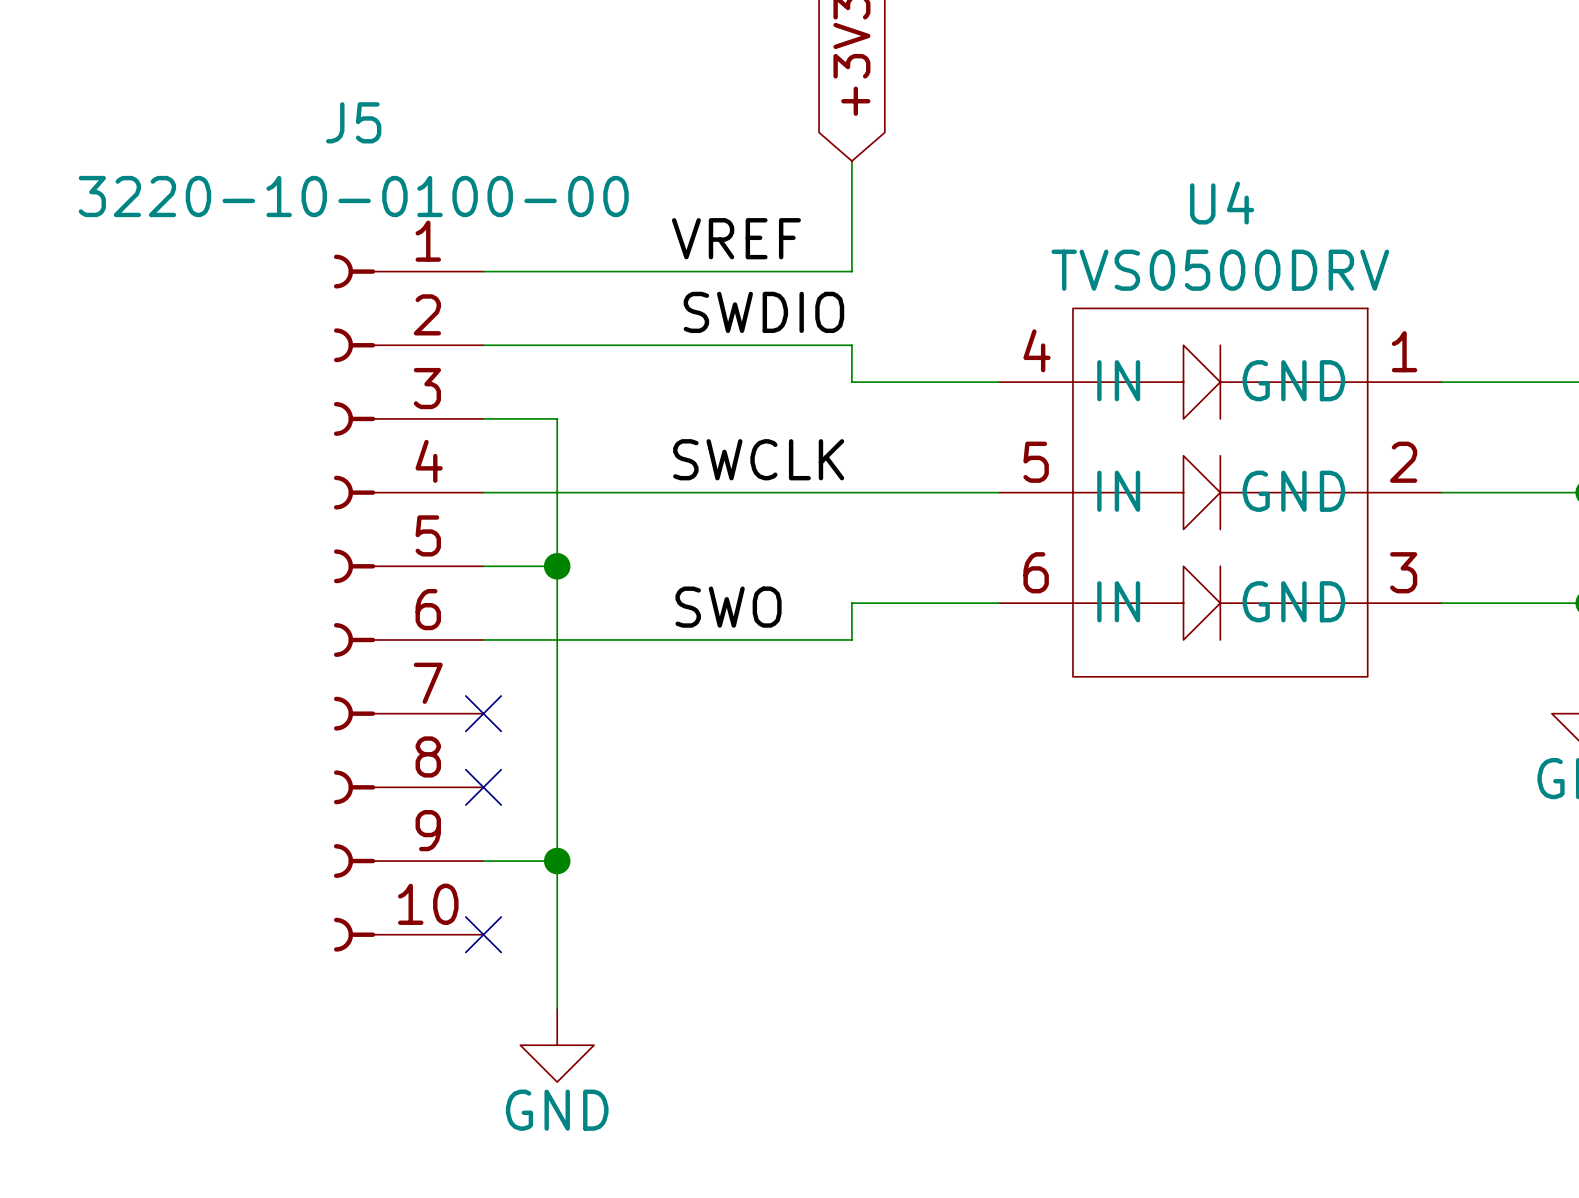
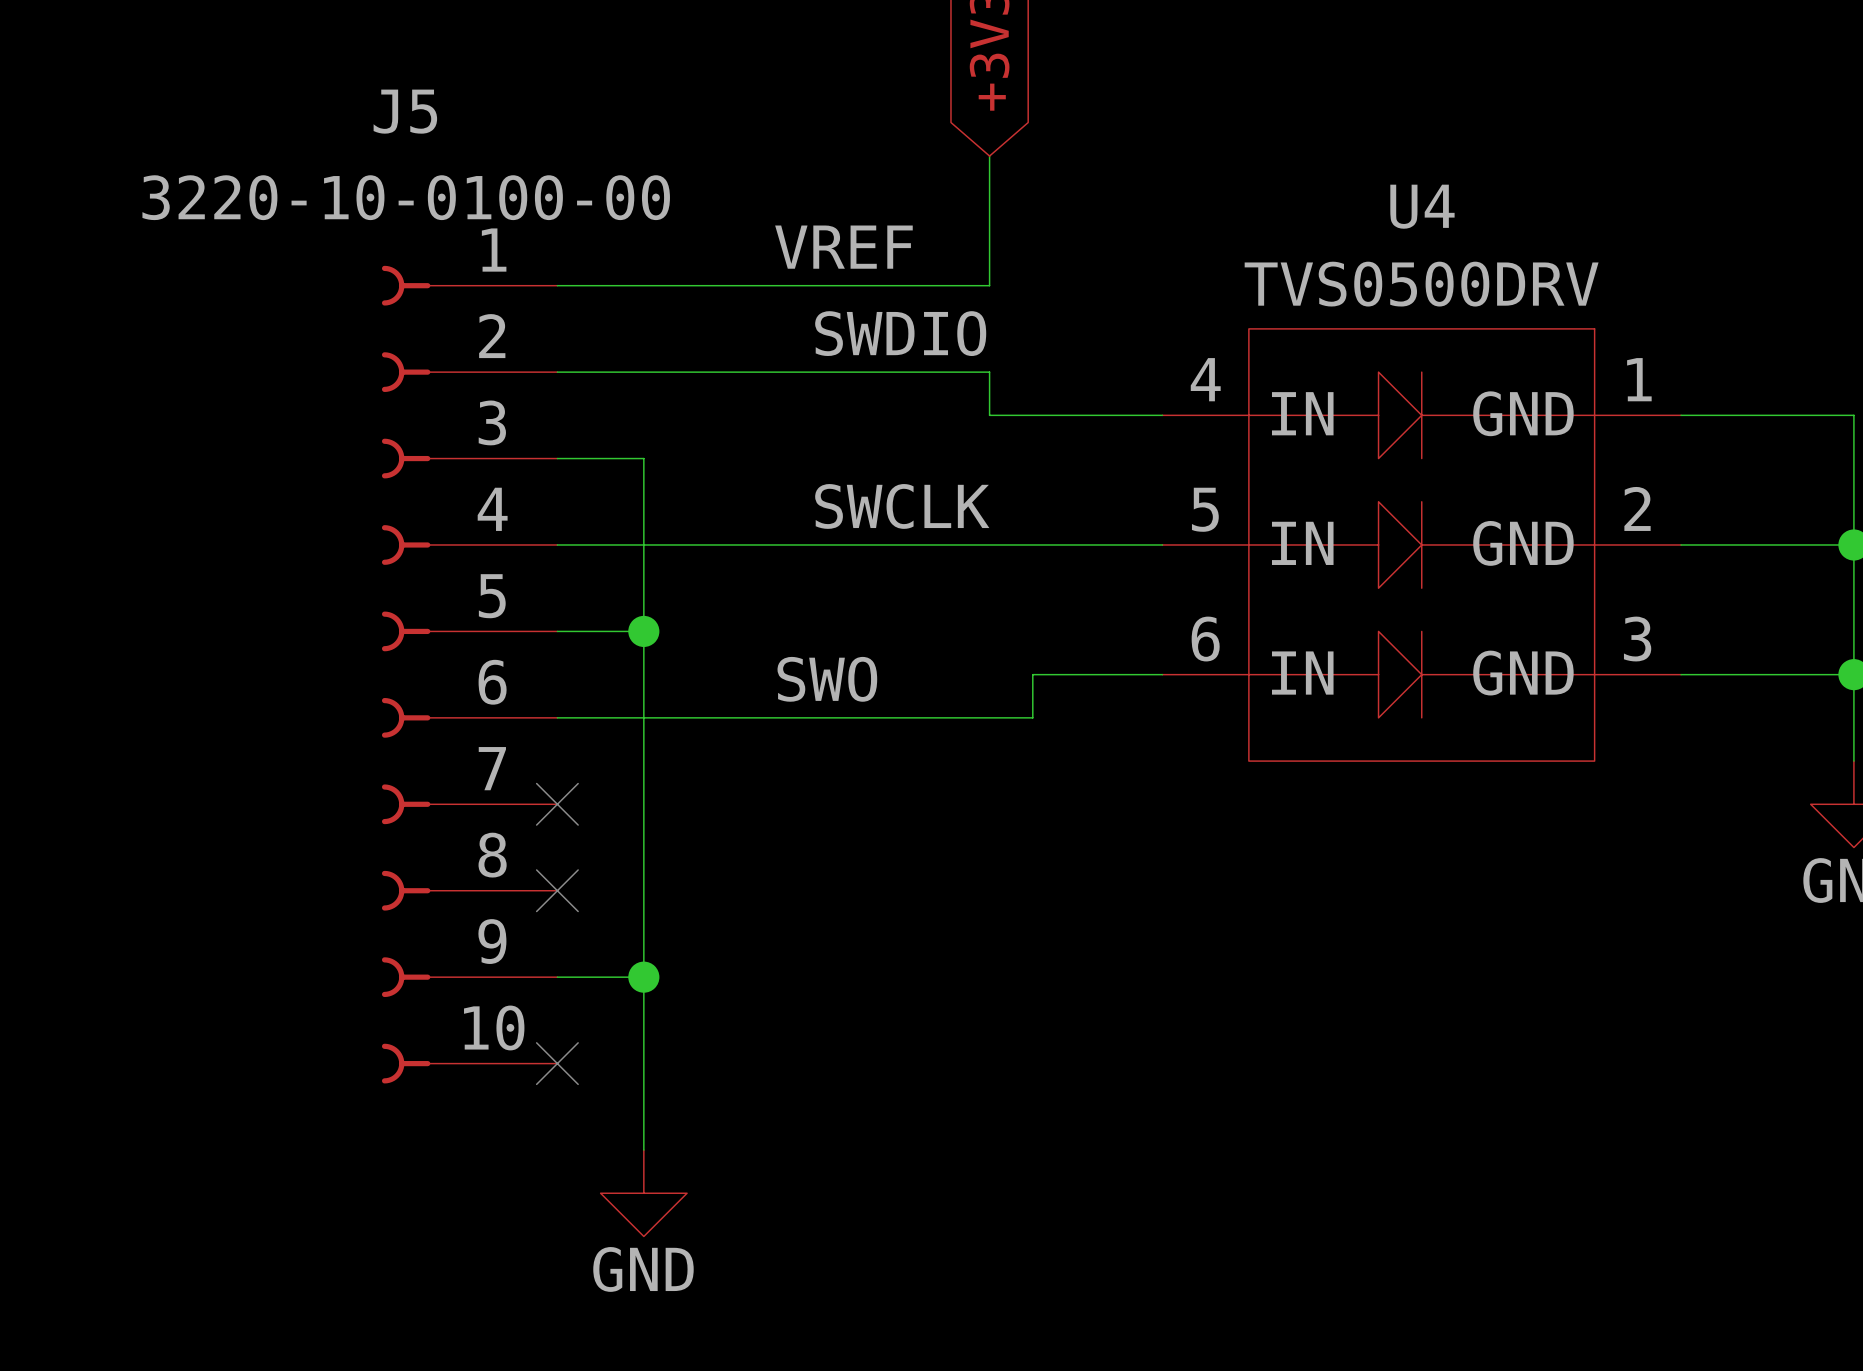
wire: (888, 603) (851, 603) (851, 639) -> (1032, 674) (1032, 717) (989, 717)

